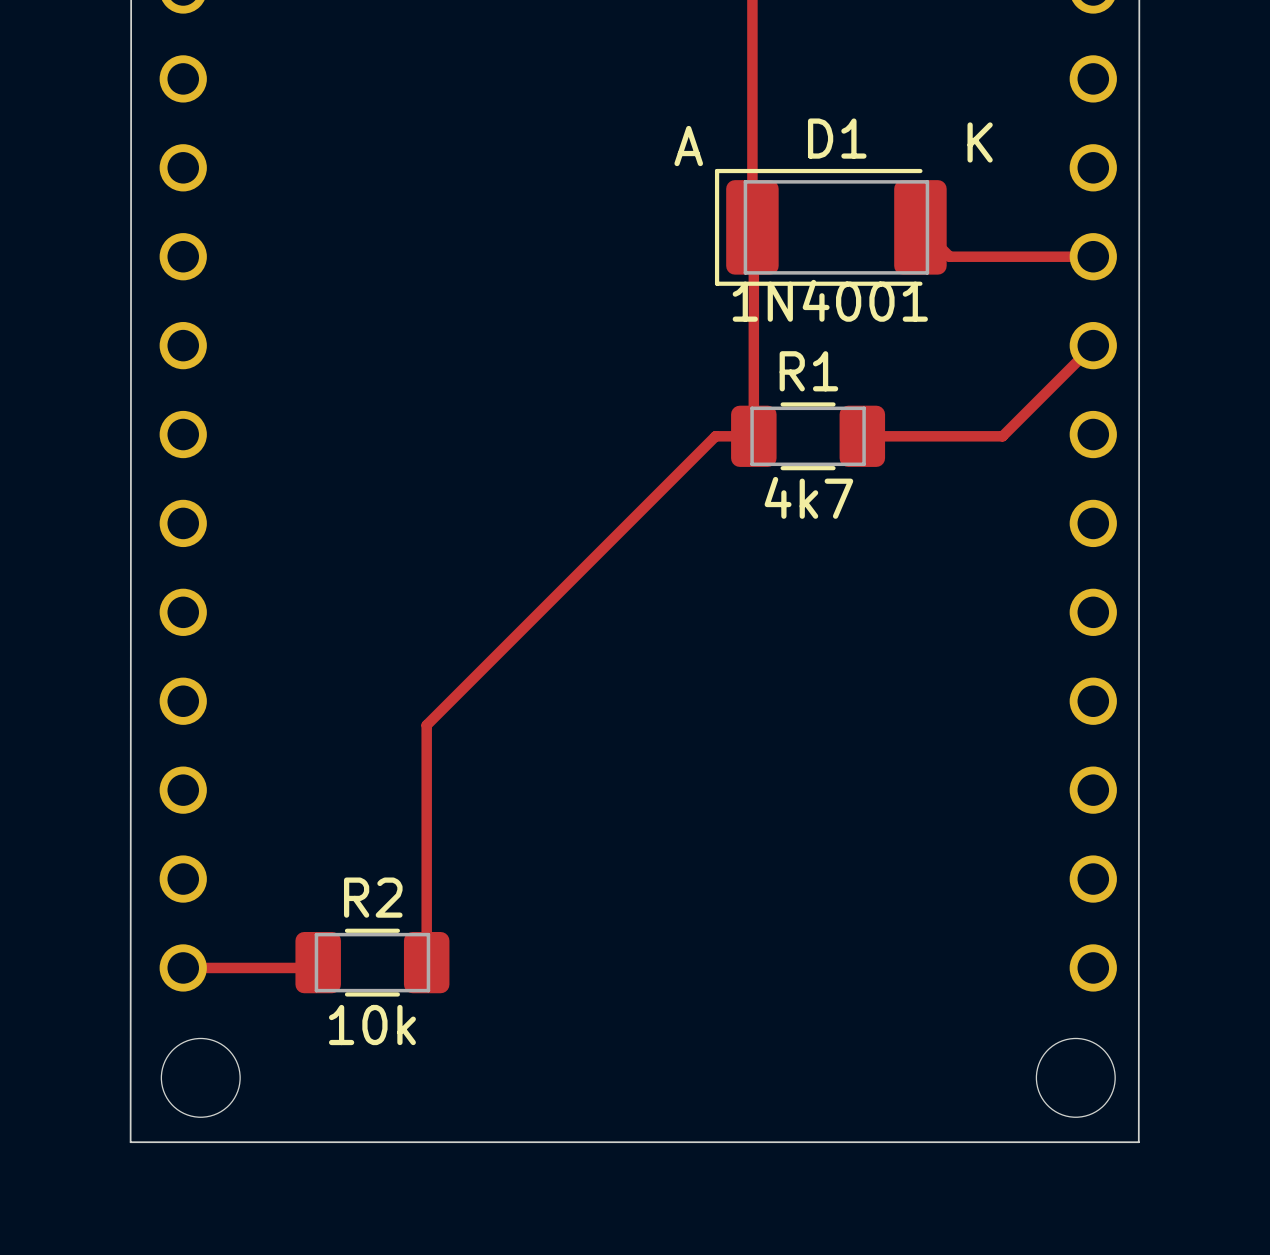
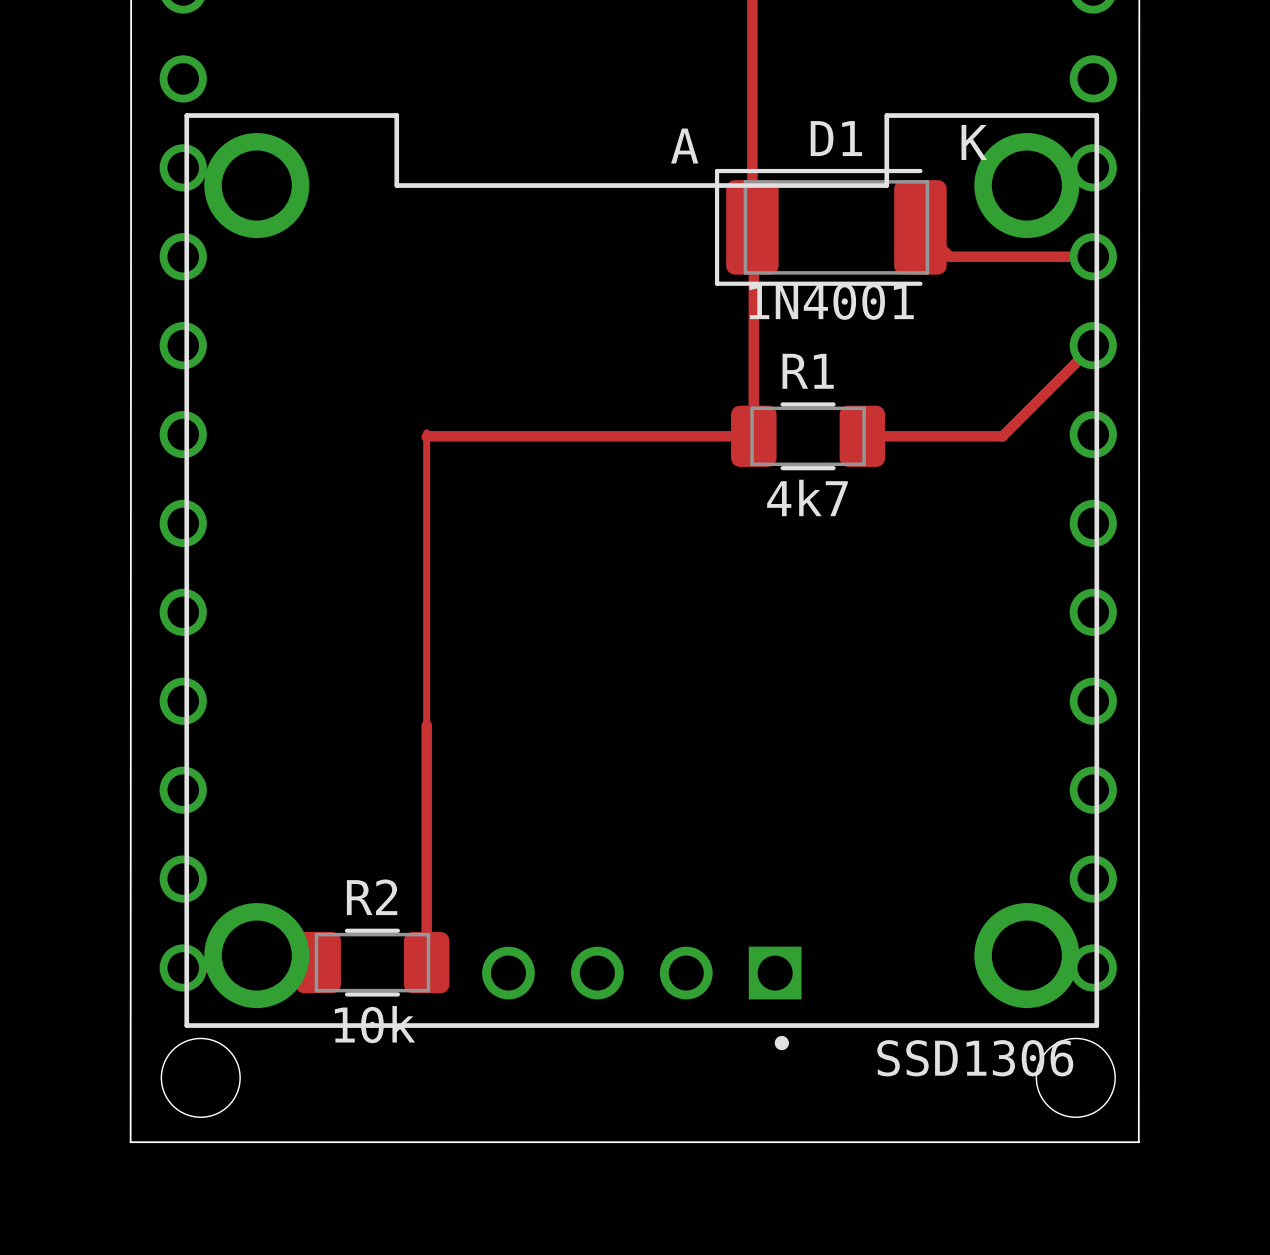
top track: none -> (426, 432) (426, 725)
top track: (715, 436) (426, 725) -> (715, 436) (426, 437)
SSD1306: none -> (641, 581)

